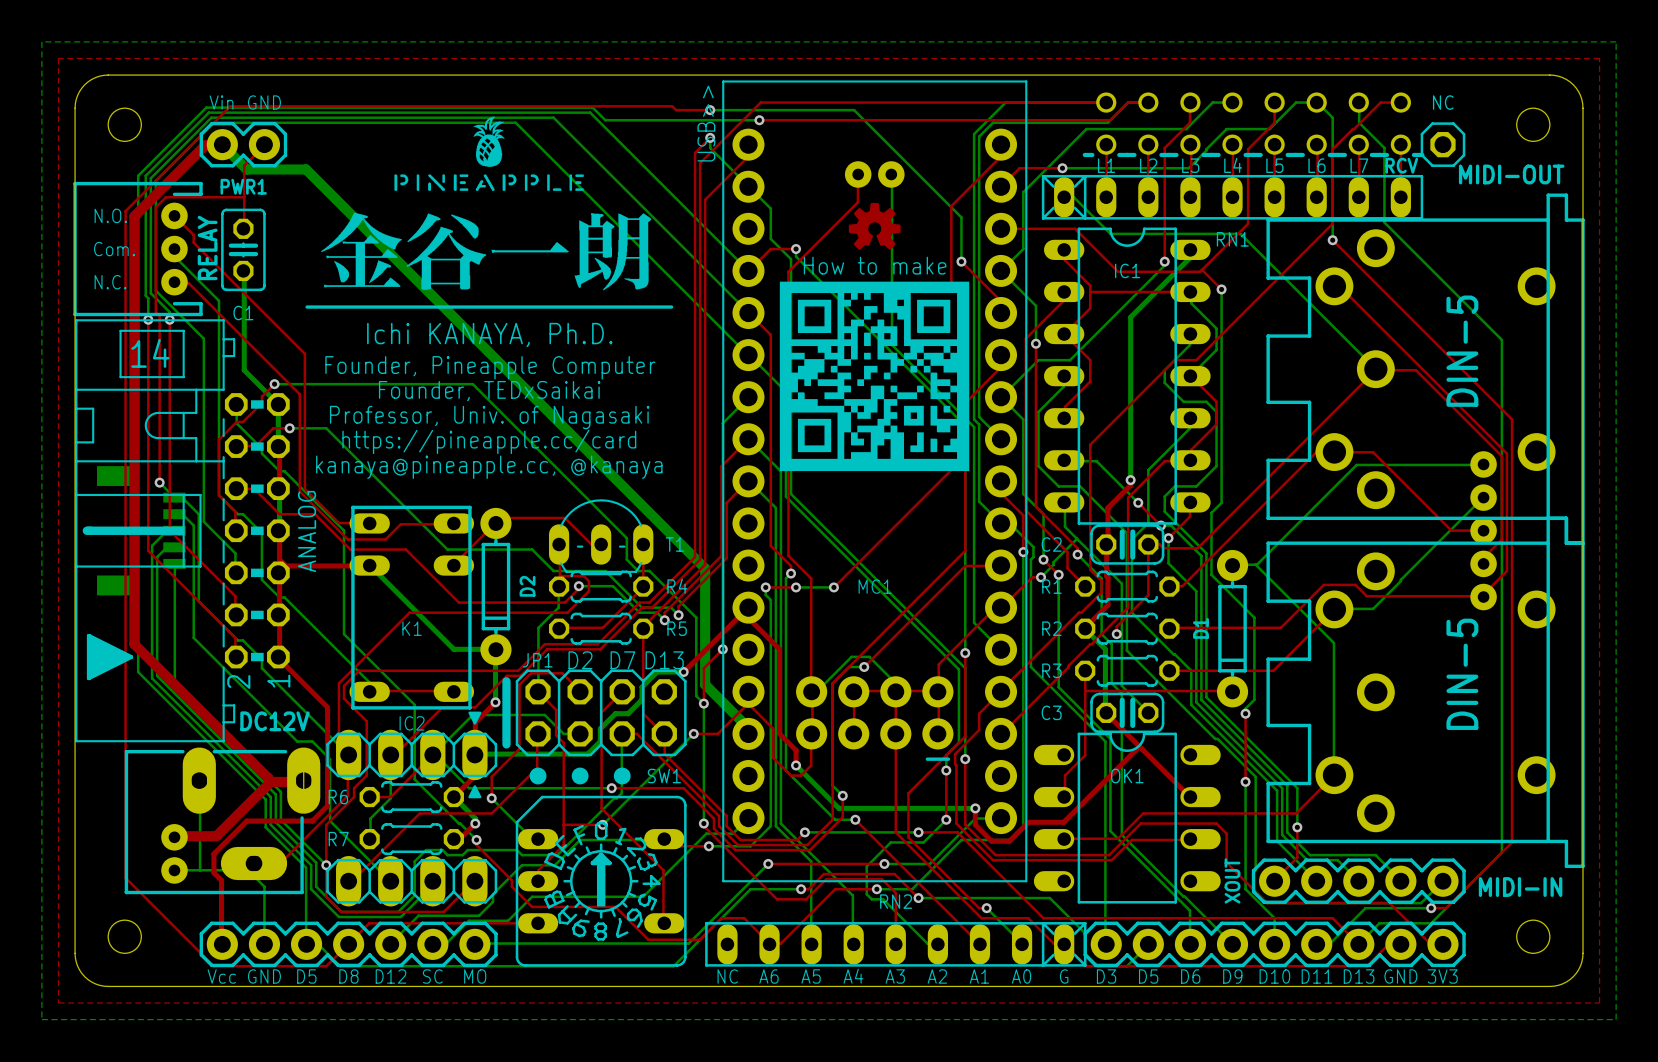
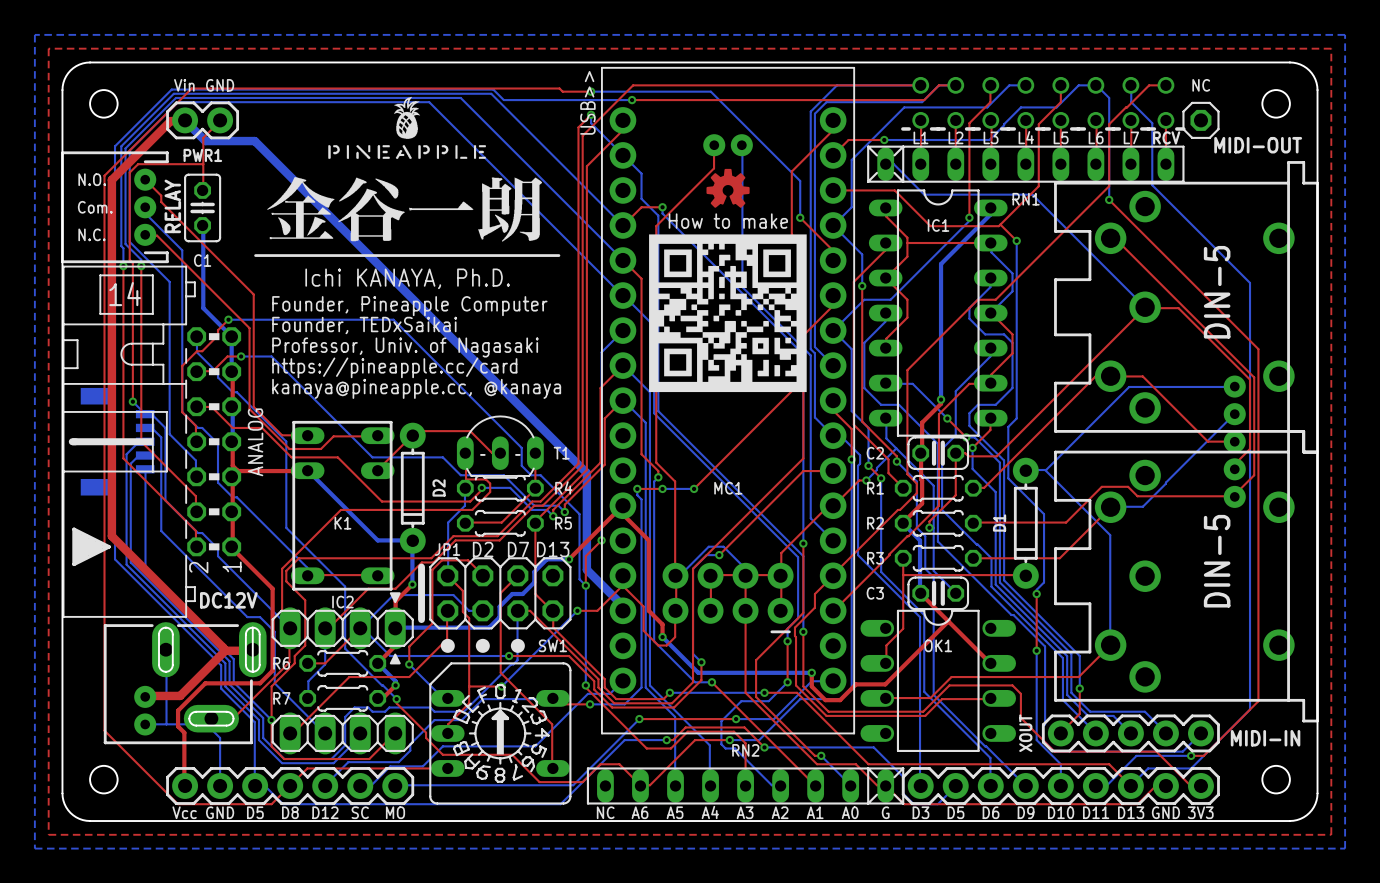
text position: Founder, Pineapple Computer (490, 367) -> Founder, Pineapple Computer (409, 306)
text position: Founder, TEDxSaikai (489, 391) -> Founder, TEDxSaikai (364, 325)
text position: Professor, Univ. of Nagasaki (489, 417) -> Professor, Univ. of Nagasaki (405, 347)
text position: https://pineapple.cc/card (489, 441) -> https://pineapple.cc/card (394, 367)
text position: kanaya@pineapple.cc, @kanaya (489, 467) -> kanaya@pineapple.cc, @kanaya (416, 388)

